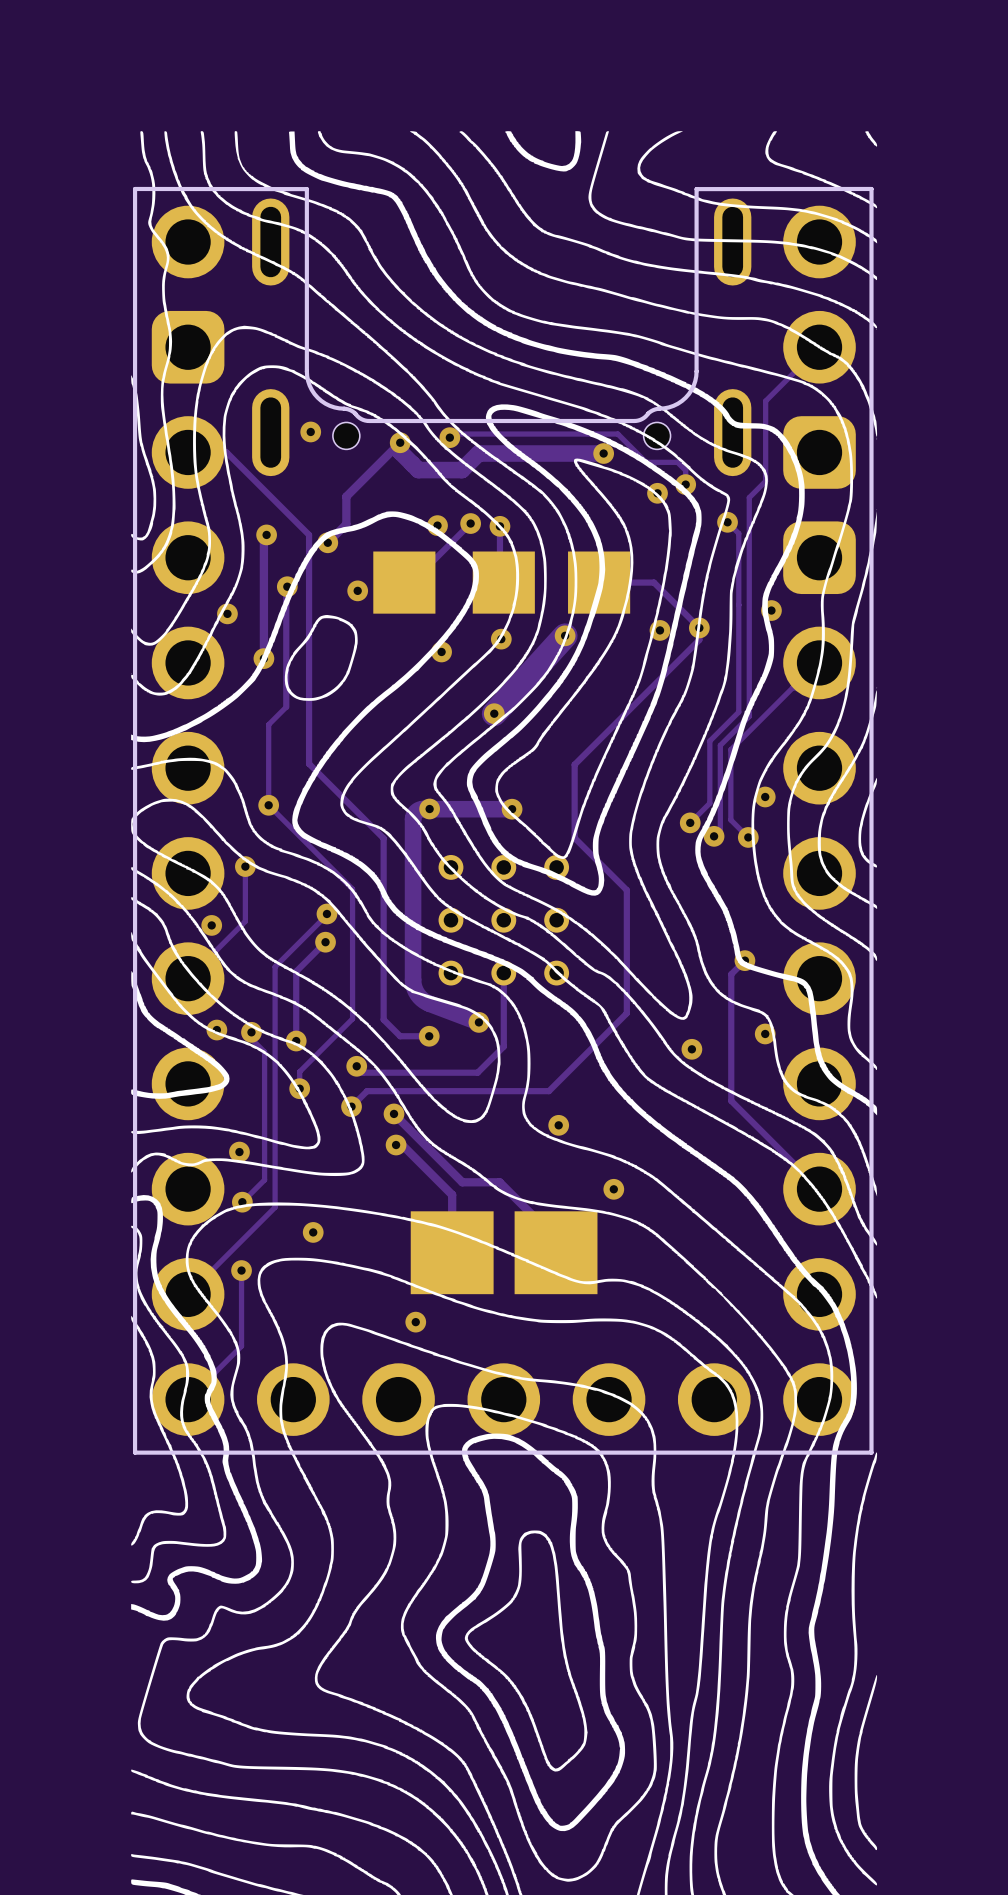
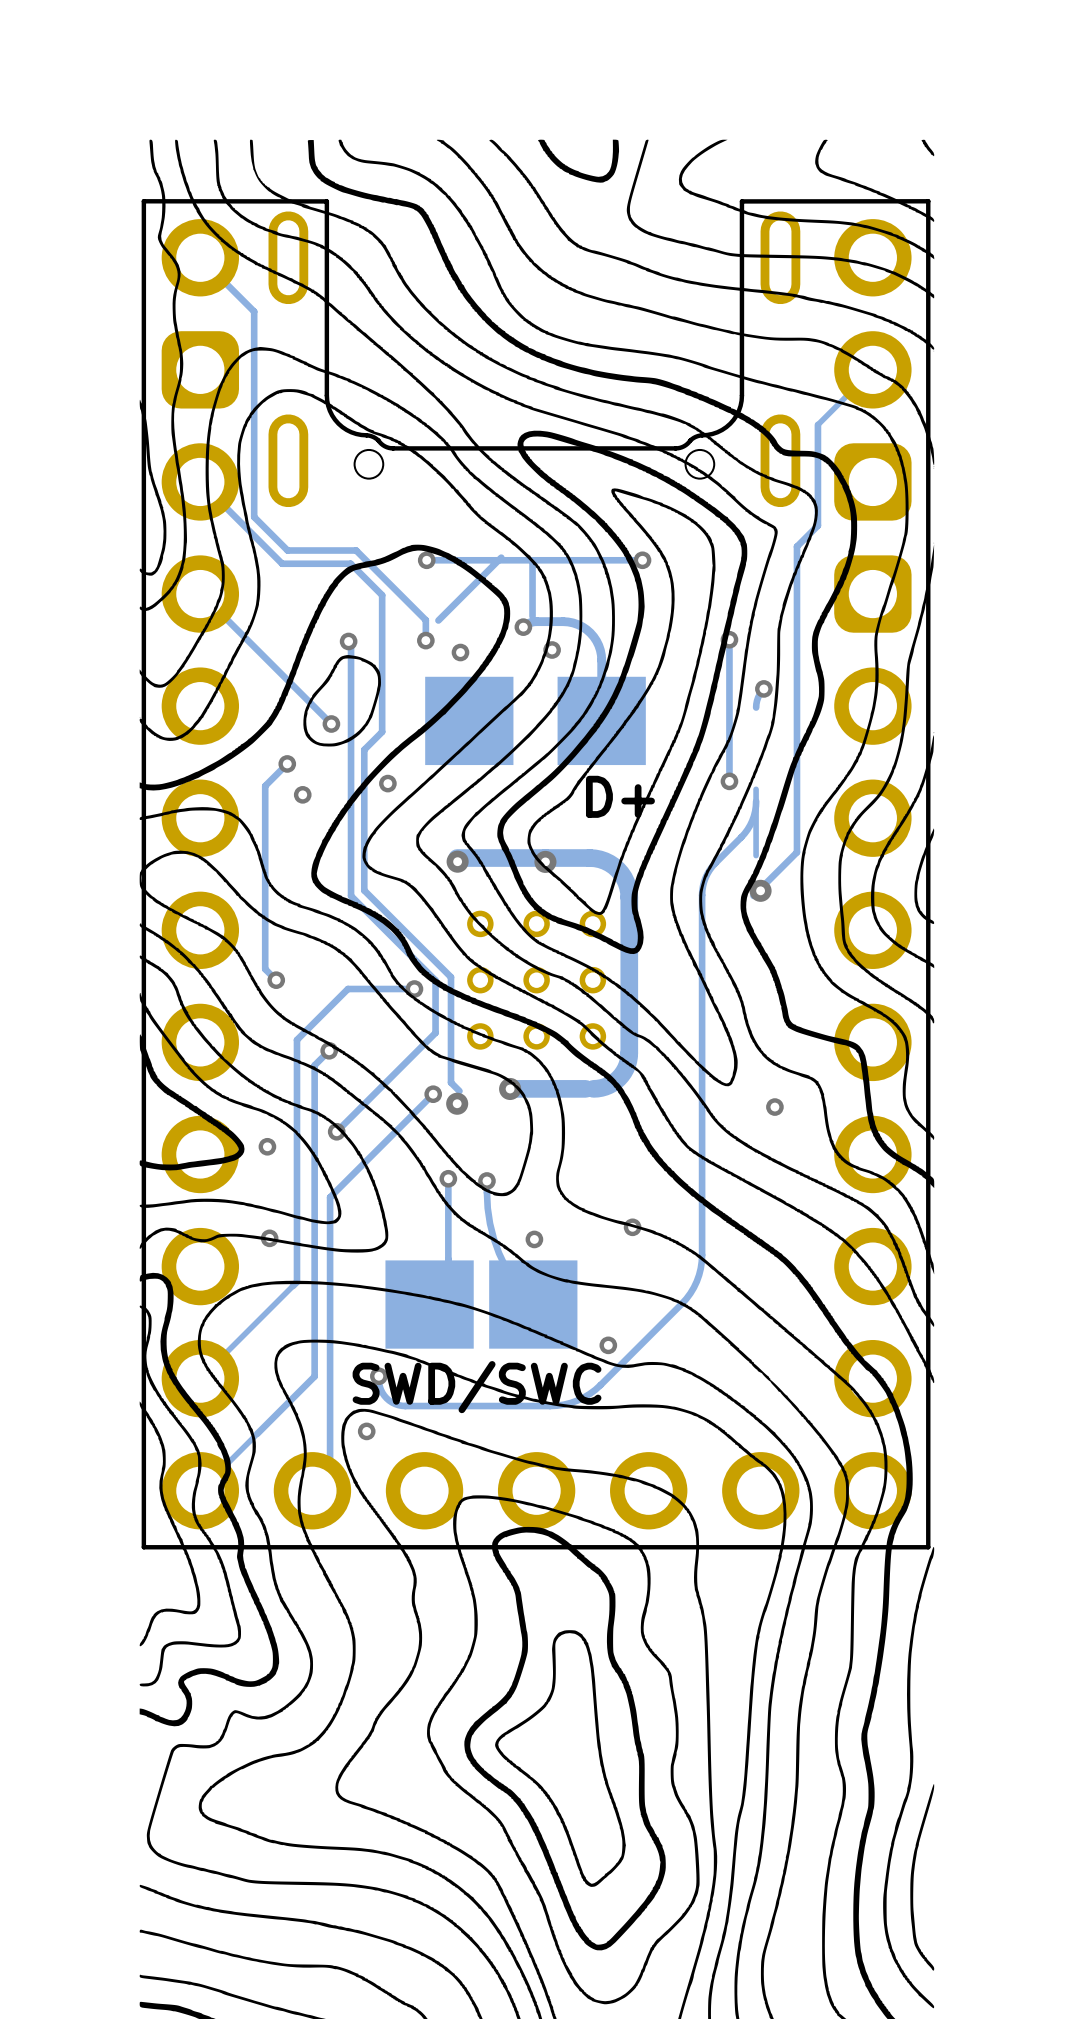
track: none -> (200, 257) (254, 311) (254, 517) (287, 550) (356, 550) (425, 620) (425, 640)
track: (767, 398) (765, 401) (765, 481) (749, 497) (749, 716) (720, 745) (720, 830) (714, 836) -> (817, 424) (817, 525) (796, 546) (796, 852) (753, 895)
via: (310, 431) -> none
track: (449, 437) (453, 434) (617, 434) (646, 462) (677, 462) (685, 470) (685, 484) -> none
via: (449, 437) -> none
via: (400, 442) -> none
track: (188, 452) (226, 452) (309, 534) (309, 763) (383, 838) (383, 1019) (400, 1036) (429, 1036) -> (200, 481) (282, 563) (350, 563) (382, 595) (382, 731) (364, 749) (364, 890) (451, 977) (451, 1082) (459, 1091)
track: (603, 453) (478, 453) (461, 470) (418, 470) (400, 451) (400, 442) (346, 496) (346, 524) (327, 542) -> none
via: (603, 453) -> none
via: (685, 484) -> none
via: (657, 493) -> none
track: (727, 522) (738, 533) (738, 604) -> none
via: (727, 522) -> none
via: (470, 523) -> none
via: (437, 525) -> none
via: none -> (426, 560)
via: (499, 526) -> none
track: none -> (642, 560) (426, 560)
via: none -> (642, 560)
track: (266, 534) (263, 537) (263, 658) -> none
via: (266, 534) -> none
via: (327, 542) -> none
track: none -> (200, 594) (331, 724)
part: (404, 582) -> none
part: (503, 582) -> none
track: (599, 582) (653, 582) (699, 627) (699, 639) (574, 764) (574, 838) (626, 890) (626, 1013) (548, 1091) (367, 1091) (351, 1106) -> none
part: (599, 582) -> none
track: (287, 586) (286, 707) (268, 724) (268, 805) (352, 889) (352, 1018) (299, 1071) (299, 1088) -> none
via: (287, 586) -> none
track: none -> (523, 627) (534, 621) (568, 621) (582, 626) (593, 636) (601, 655) (601, 720)
via: none -> (523, 627)
via: (357, 590) -> none
track: none -> (729, 639) (729, 781)
via: none -> (729, 639)
via: none -> (425, 640)
track: none -> (348, 641) (351, 643) (351, 895) (435, 980) (435, 1032) (336, 1131)
via: none -> (348, 641)
track: (738, 605) (738, 712) (709, 741) -> none
via: none -> (552, 650)
via: (771, 610) -> none
via: none -> (460, 652)
via: (227, 613) -> none
via: (699, 627) -> none
via: (659, 630) -> none
track: (565, 635) (494, 713) -> none
via: (565, 635) -> none
via: (501, 639) -> none
track: none -> (763, 688) (758, 697) (756, 707)
via: none -> (763, 688)
via: (441, 651) -> none
via: (263, 658) -> none
part: none -> (469, 720)
part: none -> (601, 720)
via: none -> (331, 724)
track: (819, 687) (792, 687) (730, 749) (730, 819) (748, 837) -> none
via: (494, 713) -> none
track: none -> (287, 763) (265, 786) (265, 969) (276, 980)
via: none -> (287, 763)
via: none -> (729, 781)
via: none -> (387, 783)
via: none -> (302, 794)
text: none -> D+ (620, 796)
track: none -> (756, 801) (753, 816) (747, 829) (709, 870) (702, 890) (702, 1255) (699, 1275) (690, 1293) (600, 1385) (589, 1393) (570, 1402) (549, 1406) (401, 1405) (392, 1402) (384, 1395) (379, 1386) (378, 1376)
via: (765, 796) -> none
track: (709, 803) (690, 822) -> none
via: (268, 805) -> none
track: (512, 809) (422, 809) (416, 812) (413, 818) (413, 979) (414, 988) (419, 996) (426, 1002) (478, 1022) -> (457, 858) (595, 858) (613, 866) (621, 873) (627, 887) (629, 1053) (623, 1072) (612, 1083) (597, 1088) (510, 1088)
via: (690, 822) -> none
via: (748, 837) -> none
track: (245, 866) (245, 921) (188, 978) -> none
via: (245, 866) -> none
via: (326, 913) -> none
track: (326, 915) (275, 966) (275, 1207) -> (414, 989) (347, 989) (296, 1039) (296, 1282) (293, 1286)
via: none -> (276, 980)
via: (211, 925) -> none
via: none -> (414, 989)
track: (325, 942) (296, 971) (296, 1041) -> none
via: (325, 942) -> none
track: (744, 960) (731, 974) (731, 1100) (819, 1189) -> none
via: (744, 960) -> none
track: (503, 973) (503, 1046) (477, 1072) (363, 1072) (356, 1066) -> none
via: none -> (329, 1050)
track: none -> (433, 1094) (330, 1197) (330, 1473) (312, 1490)
via: none -> (433, 1094)
via: (216, 1030) -> none
track: (251, 1032) (251, 1038) (264, 1052) (264, 1179) (242, 1202) -> none
via: (251, 1032) -> none
via: (765, 1033) -> none
via: none -> (774, 1107)
via: (296, 1041) -> none
via: (691, 1049) -> none
via: none -> (336, 1131)
via: (356, 1066) -> none
via: none -> (267, 1146)
via: (299, 1088) -> none
via: (351, 1106) -> none
track: none -> (448, 1178) (447, 1271) (440, 1289) (429, 1304)
via: none -> (448, 1178)
track: none -> (486, 1180) (490, 1223) (499, 1253) (513, 1280) (533, 1304)
via: none -> (486, 1180)
track: (394, 1113) (462, 1182) (499, 1182) (556, 1238) (556, 1252) -> none
via: (394, 1113) -> none
via: (558, 1125) -> none
track: (396, 1145) (402, 1145) (452, 1194) (452, 1252) -> none
via: (396, 1145) -> none
via position: (239, 1152) -> (269, 1238)
via: none -> (632, 1227)
via: none -> (534, 1239)
via: (613, 1189) -> none
via: (242, 1202) -> none
part: none -> (429, 1304)
part: none -> (533, 1304)
via: (313, 1232) -> none
part: (452, 1252) -> none
part: (556, 1252) -> none
via: none -> (608, 1345)
track: (241, 1270) (241, 1346) -> (329, 1050) (314, 1065) (314, 1376) (257, 1433)
via: (241, 1270) -> none
via: none -> (378, 1376)
text: none -> SWD/SWC (477, 1387)
via: (415, 1322) -> none
via: none -> (366, 1431)

